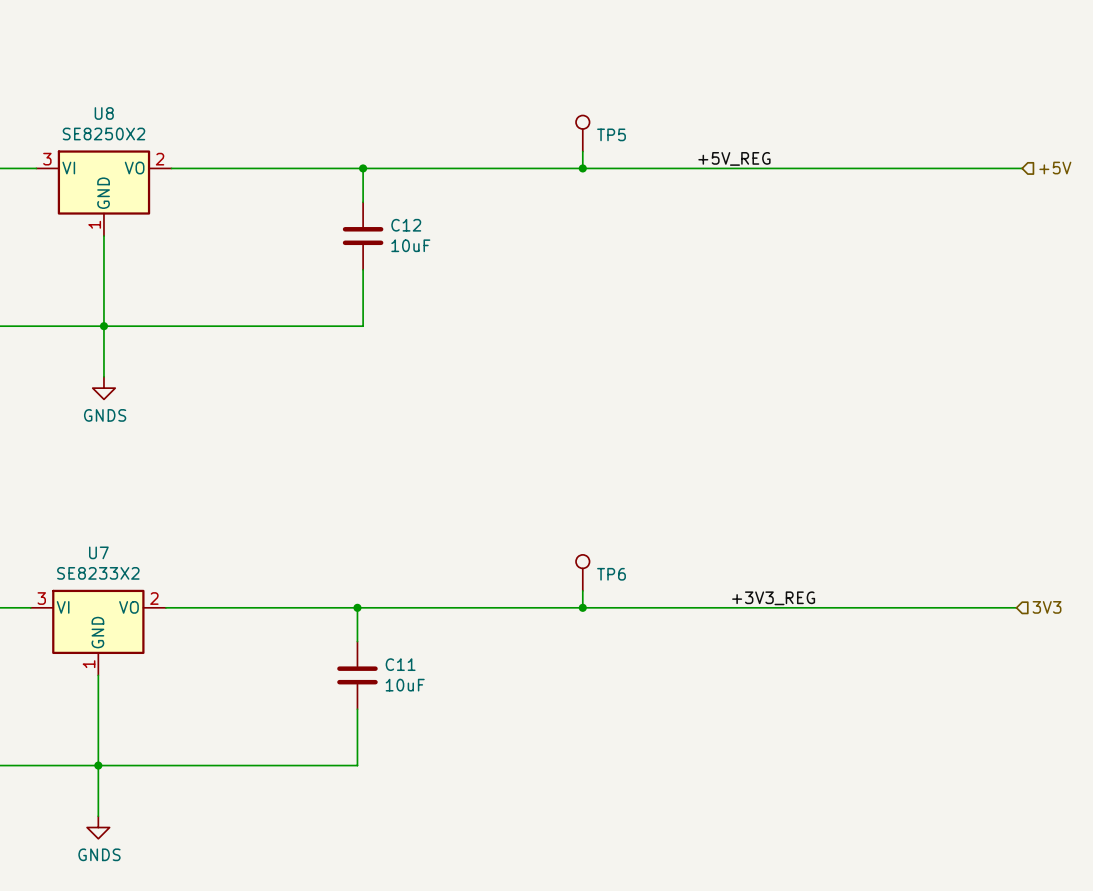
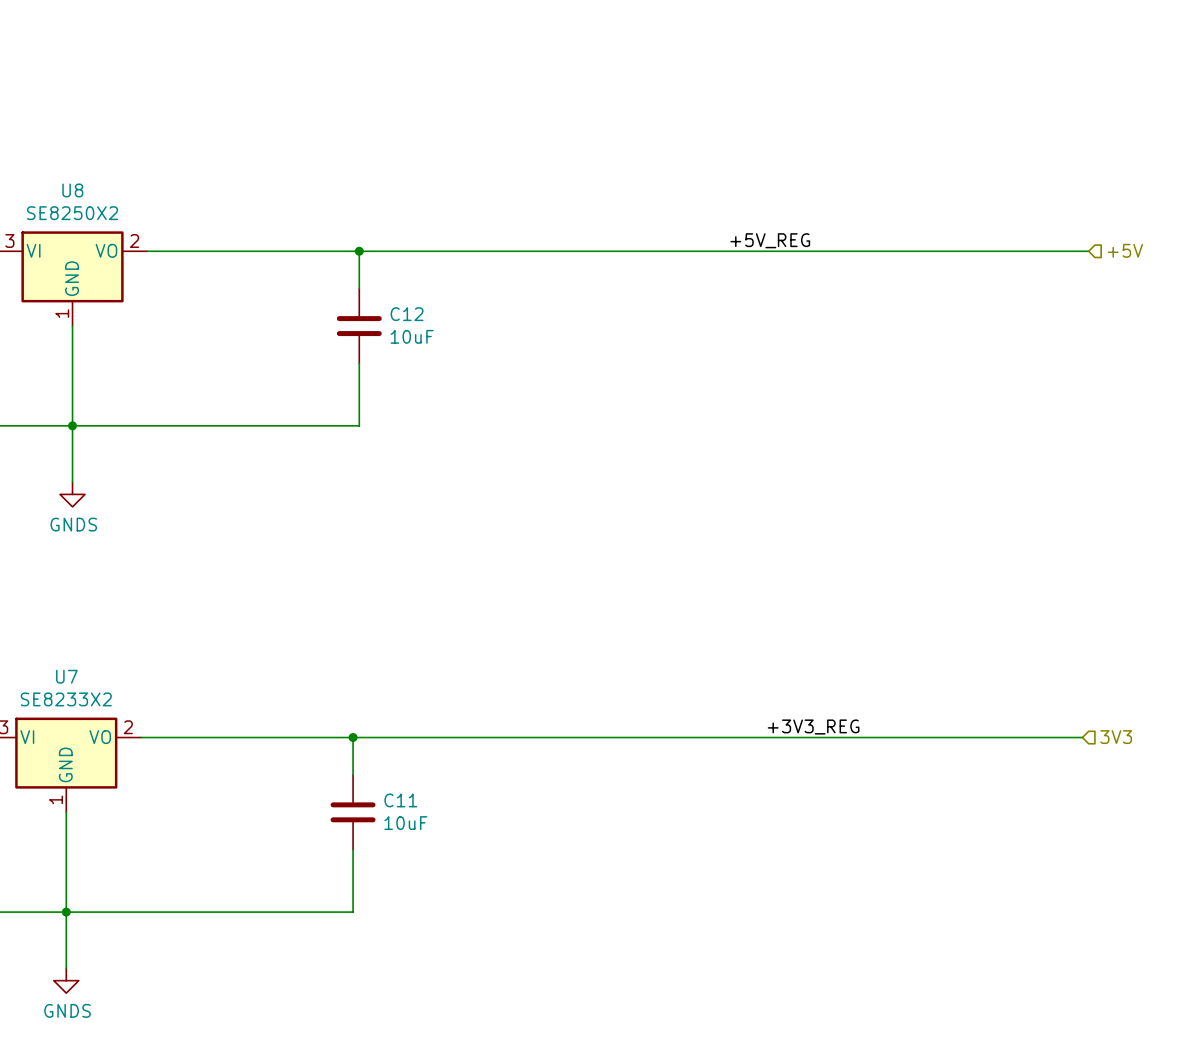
TP5: (582, 133) -> none
wire: (582, 151) (582, 168) -> none
junction: (582, 168) -> none
TP6: (582, 572) -> none
wire: (582, 590) (582, 607) -> none
junction: (582, 607) -> none

